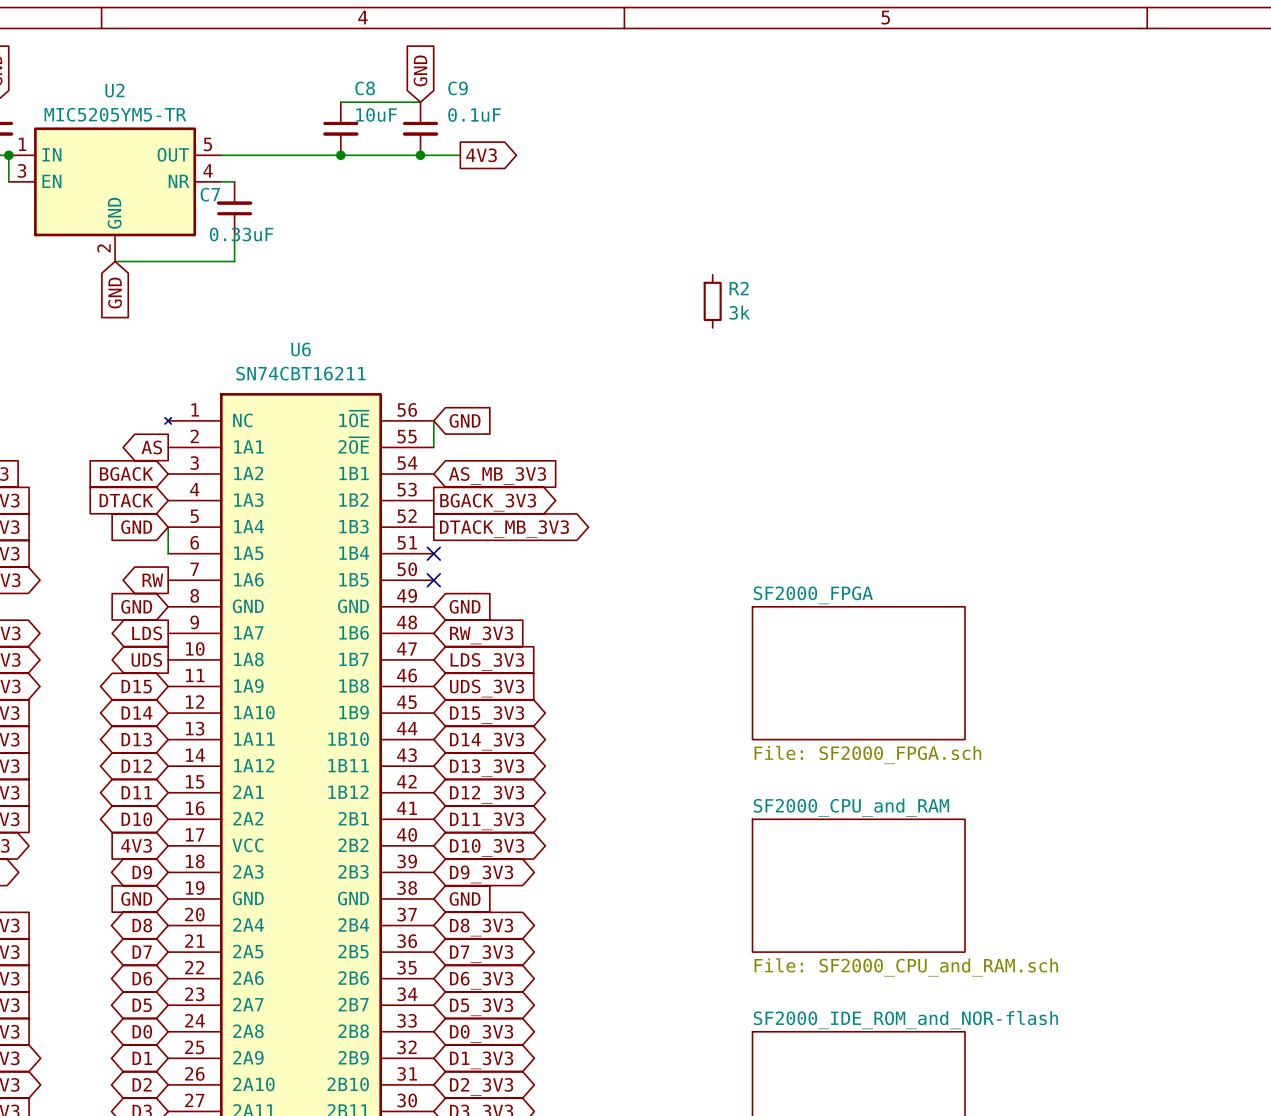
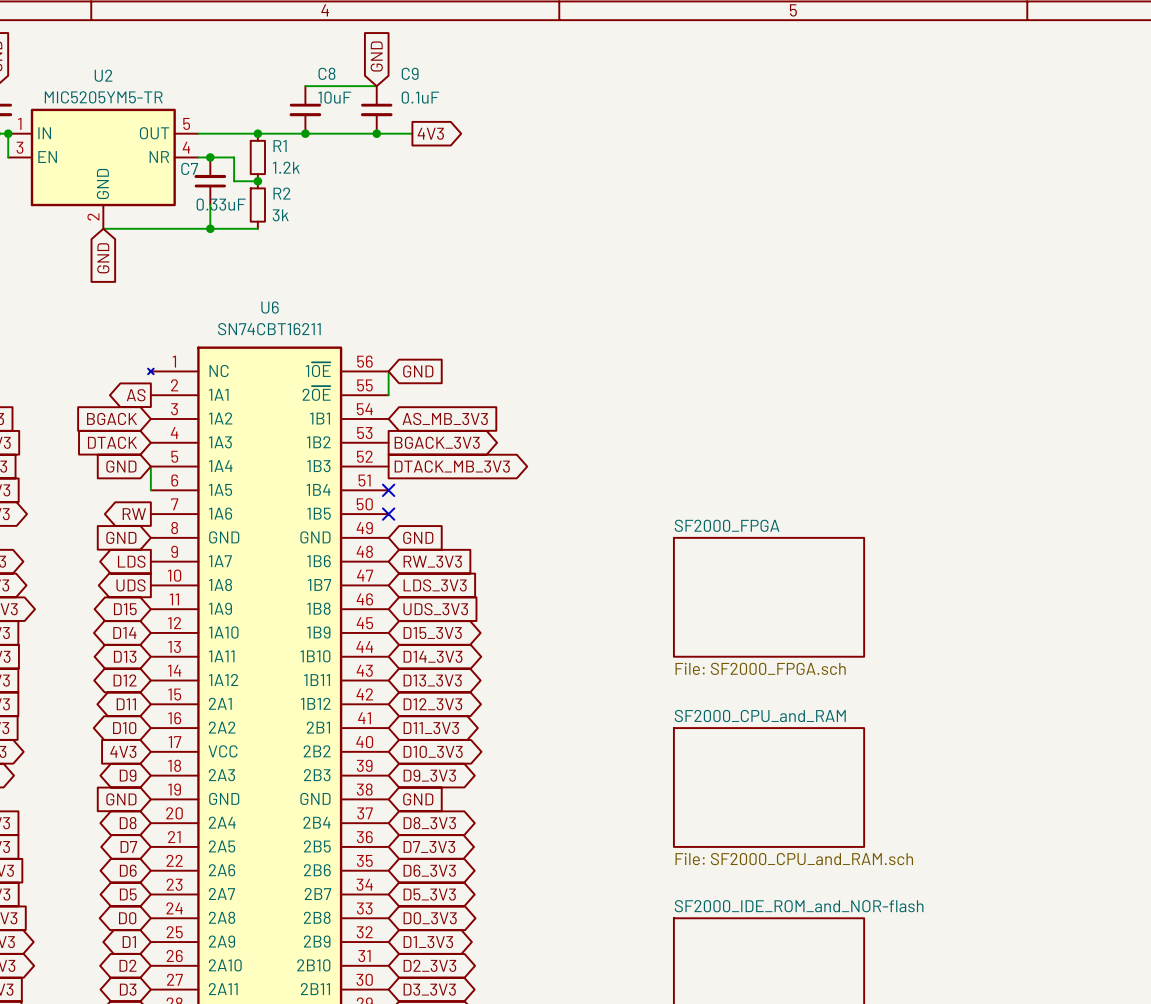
junction: none -> (257, 133)
wire: none -> (210, 157) (234, 157) (234, 181) (257, 181)
junction: none -> (210, 157)
R1: none -> 1.2k (257, 157)
junction: none -> (257, 181)
wire: none -> (210, 228) (257, 228)
junction: none -> (210, 228)
R2 position: (712, 301) -> (257, 205)

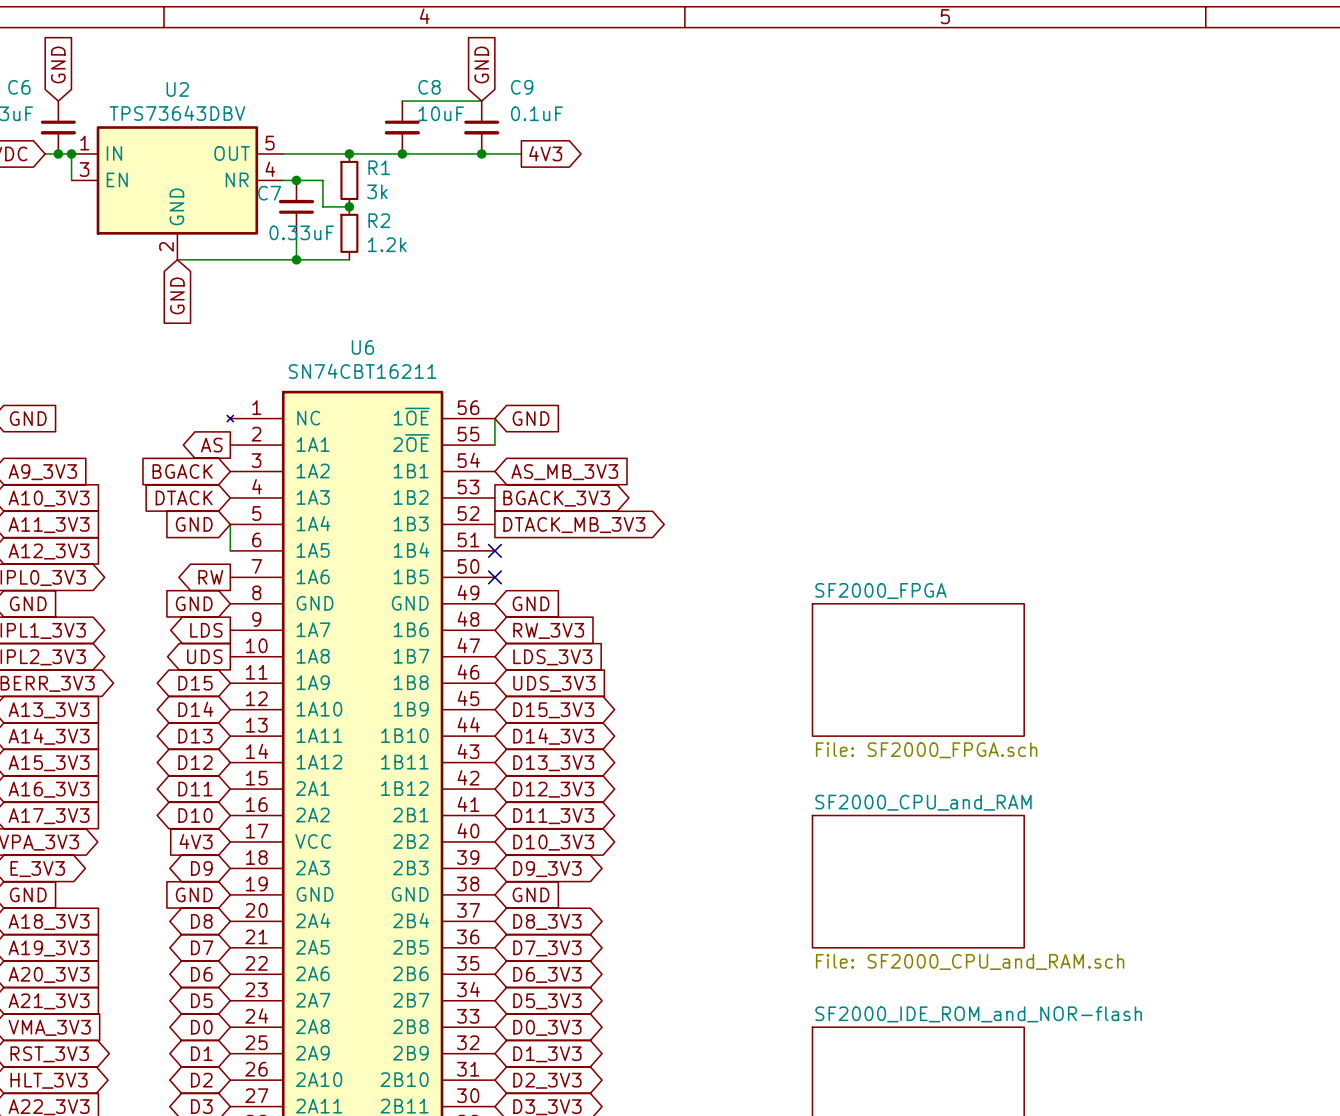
U2 value: MIC5205YM5-TR (103, 97) -> TPS73643DBV (177, 113)
R1 value: 1.2k (286, 167) -> 3k (377, 191)
R2 value: 3k (280, 215) -> 1.2k (387, 244)

